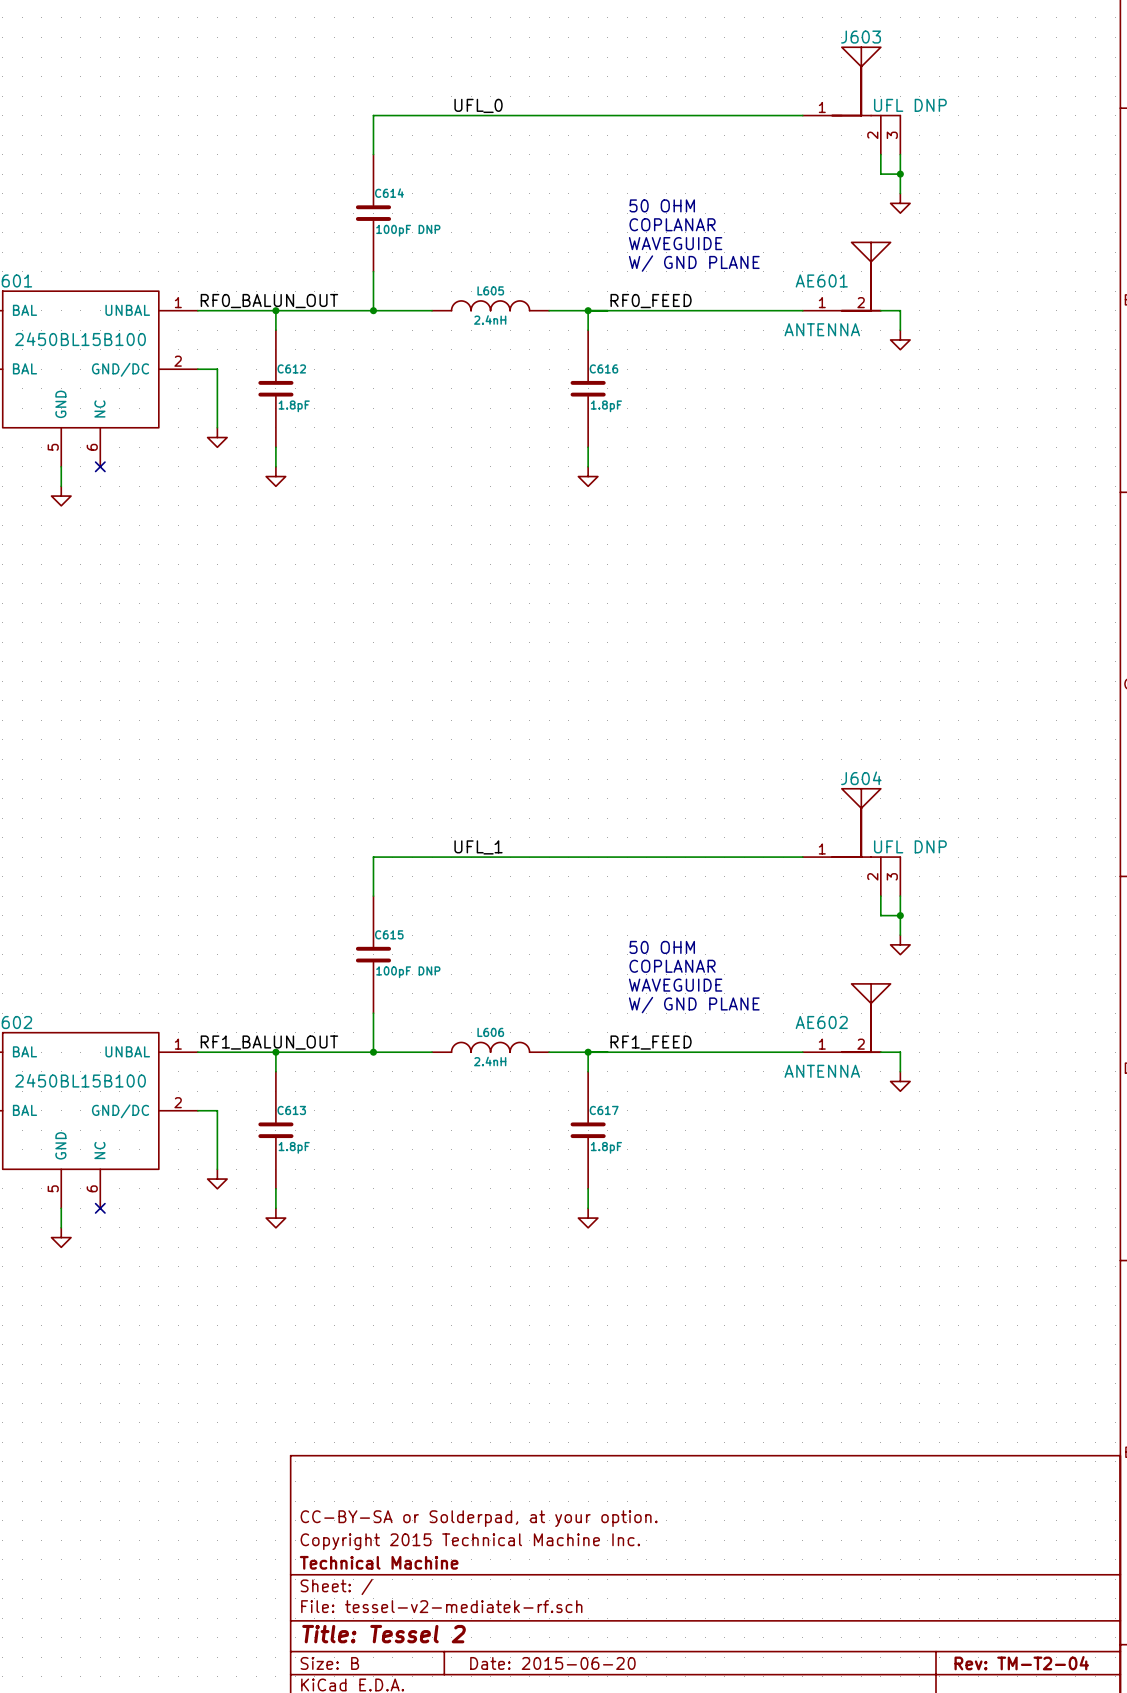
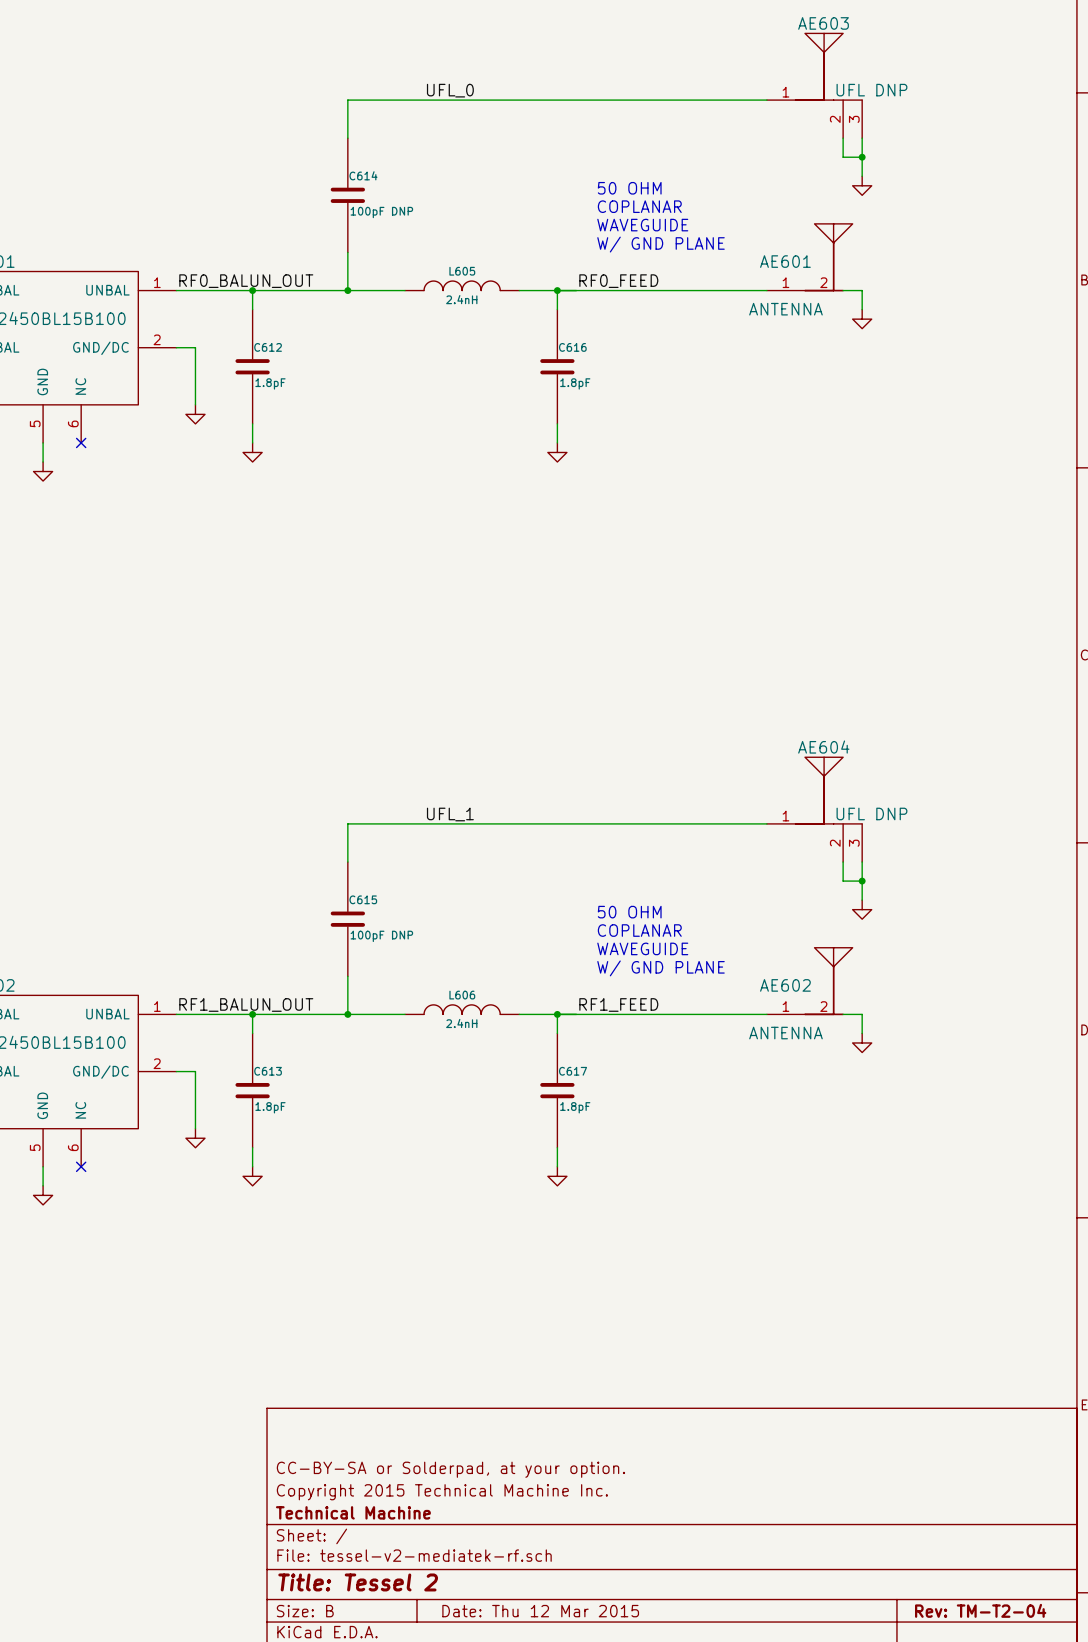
J603 name: J603 (861, 37) -> AE603 (823, 23)
J604 name: J604 (861, 778) -> AE604 (823, 747)
title block: Date: 2015-06-20 (552, 1663) -> Date: Thu 12 Mar 2015 (540, 1611)

